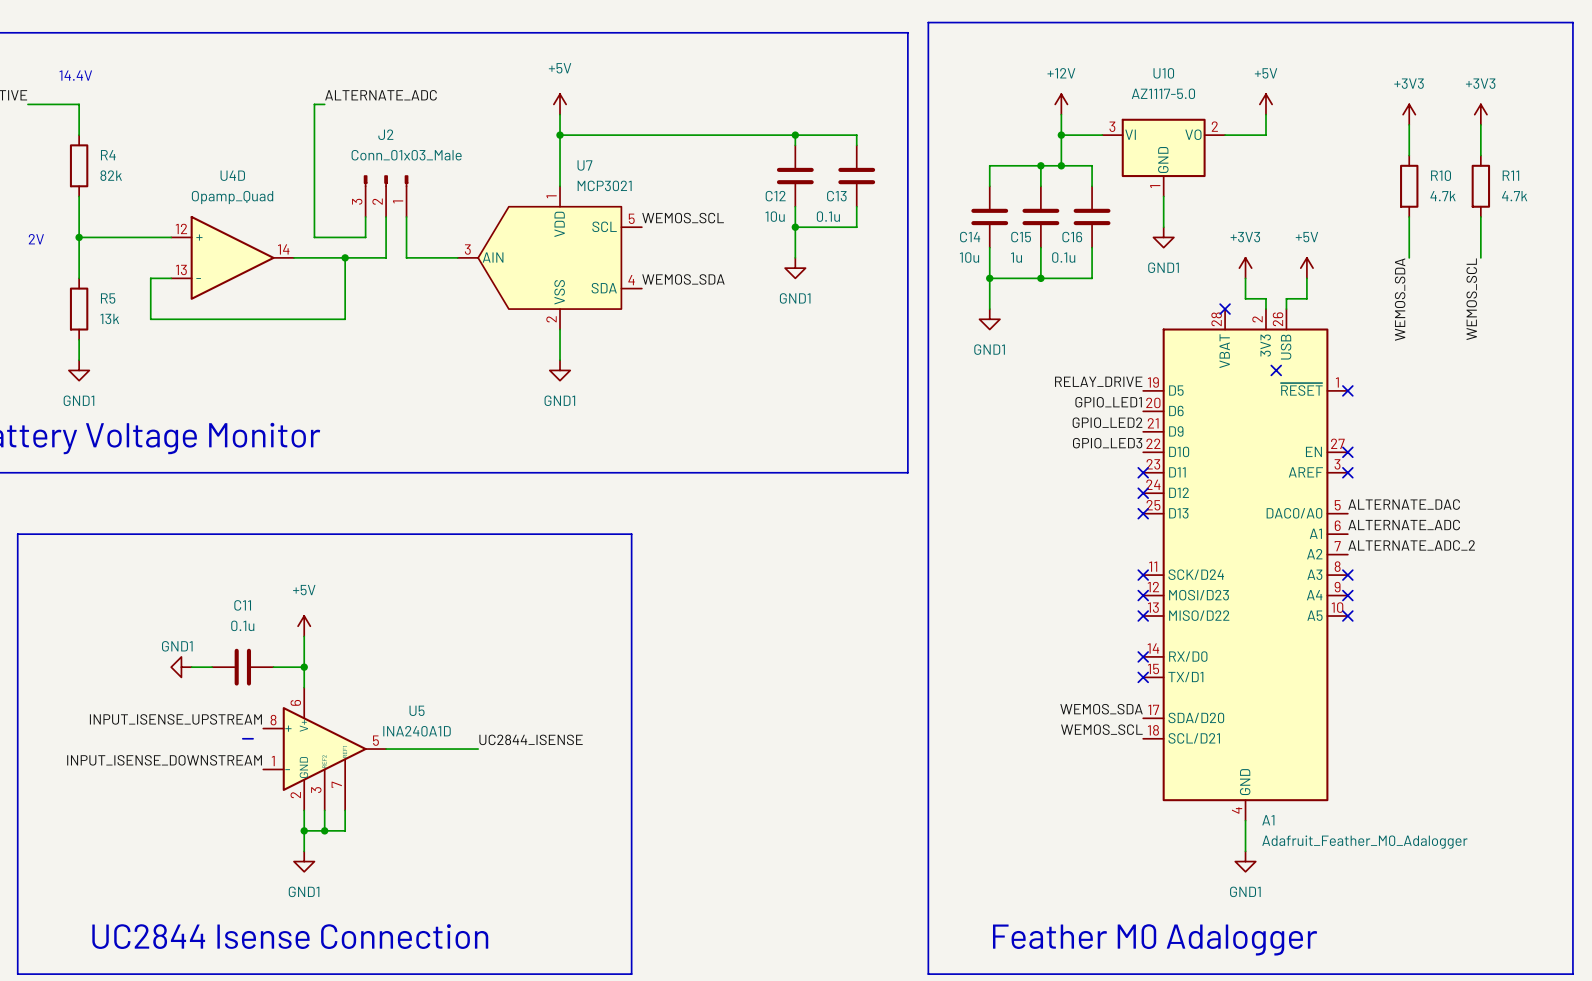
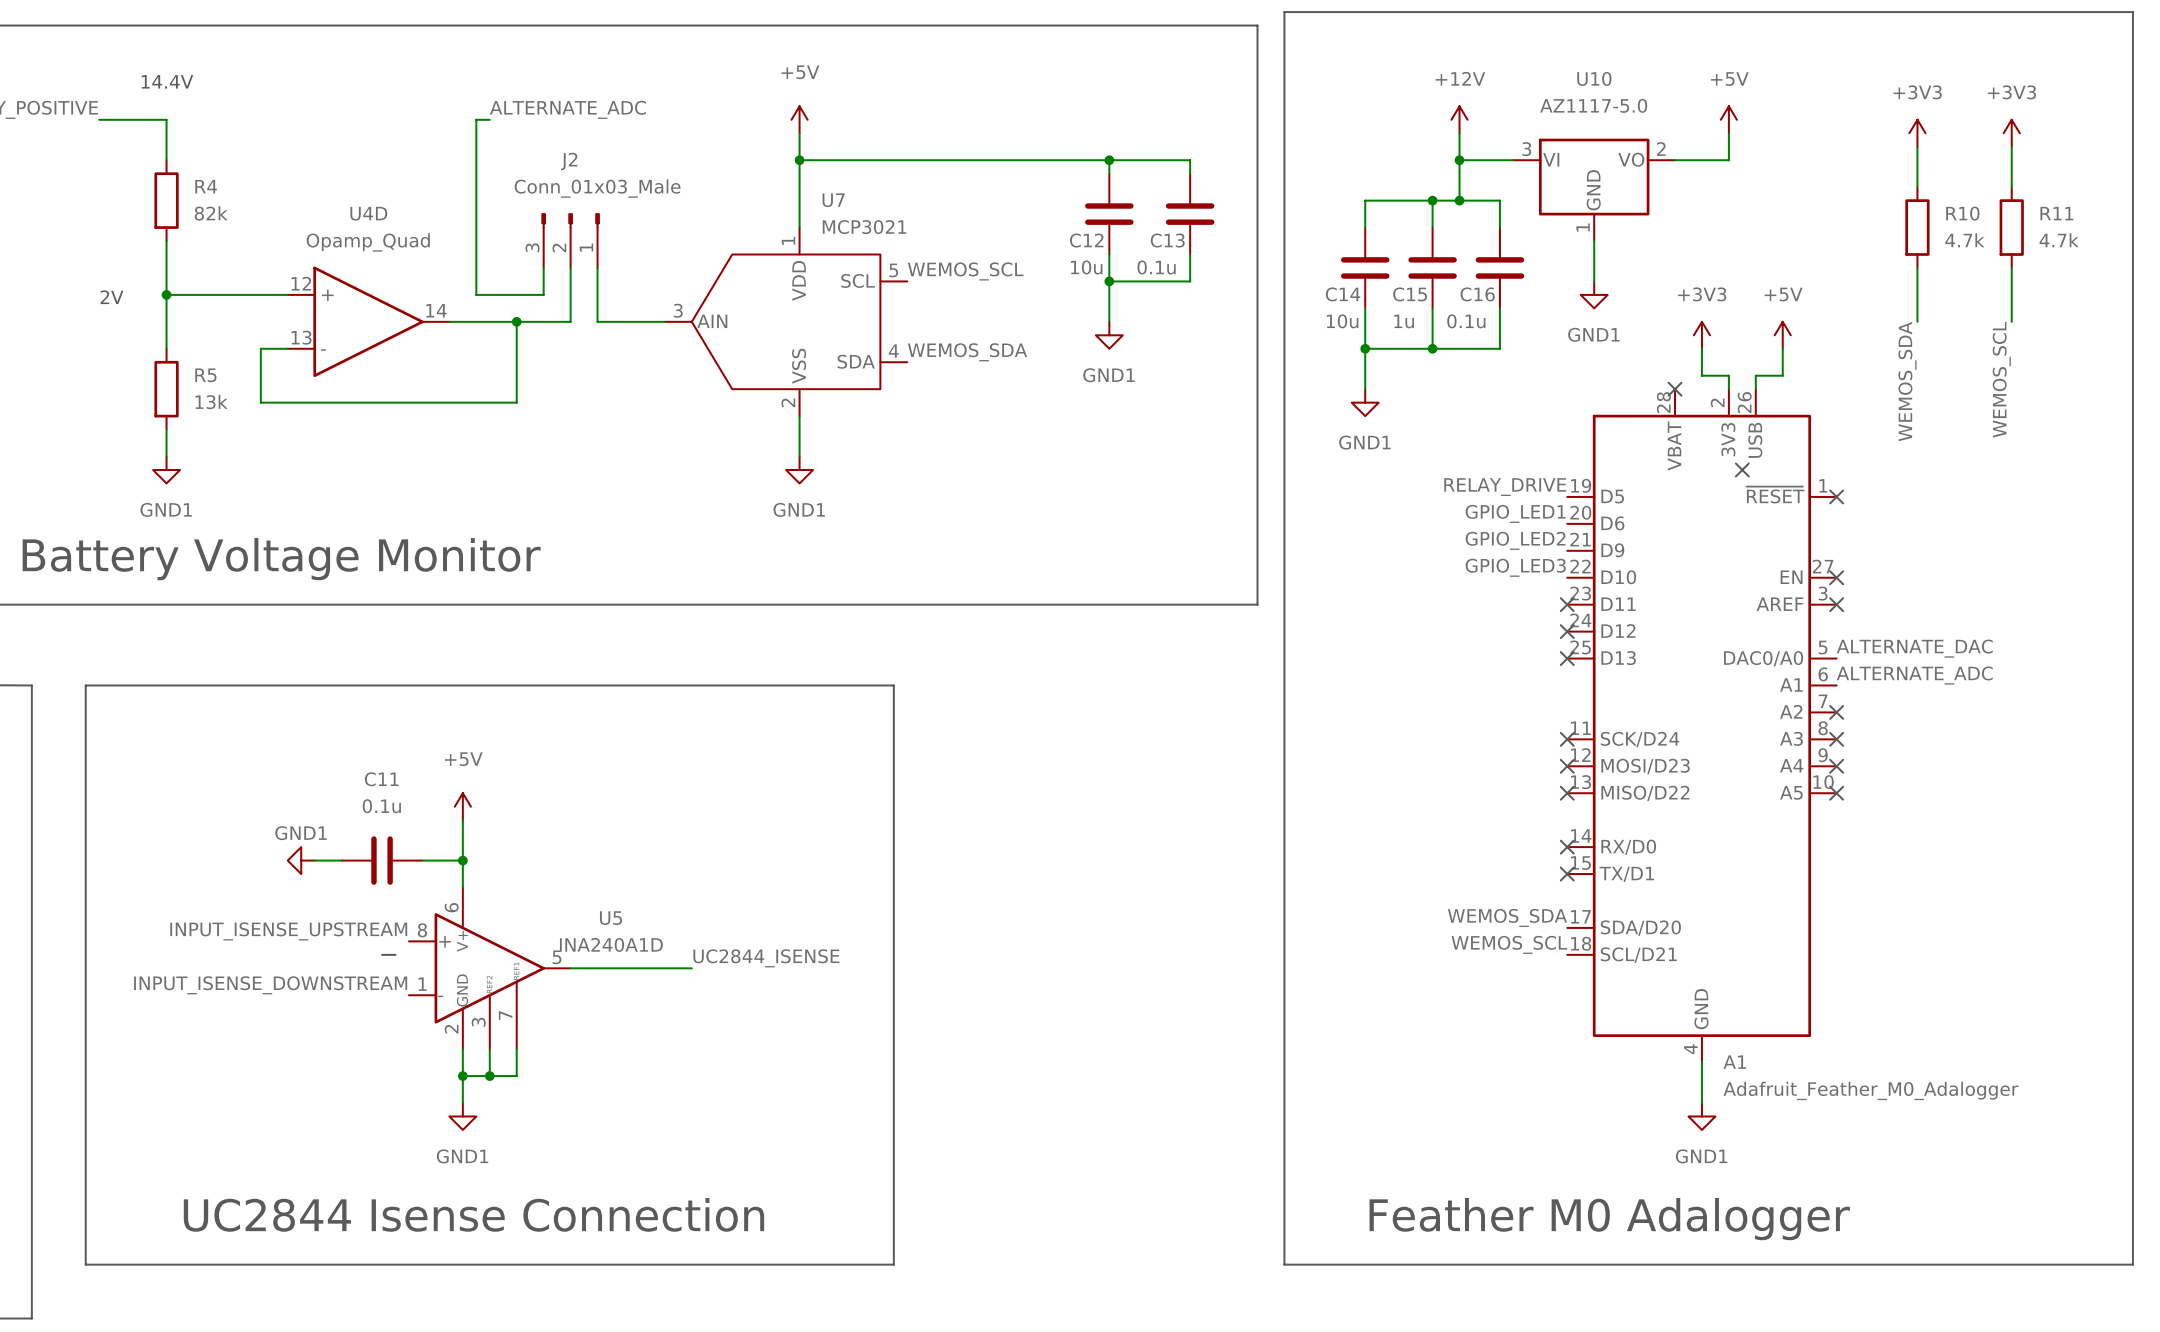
label: ALTERNATE_ADC_2 (1411, 545) -> none
no-connect mark: none -> (1836, 712)

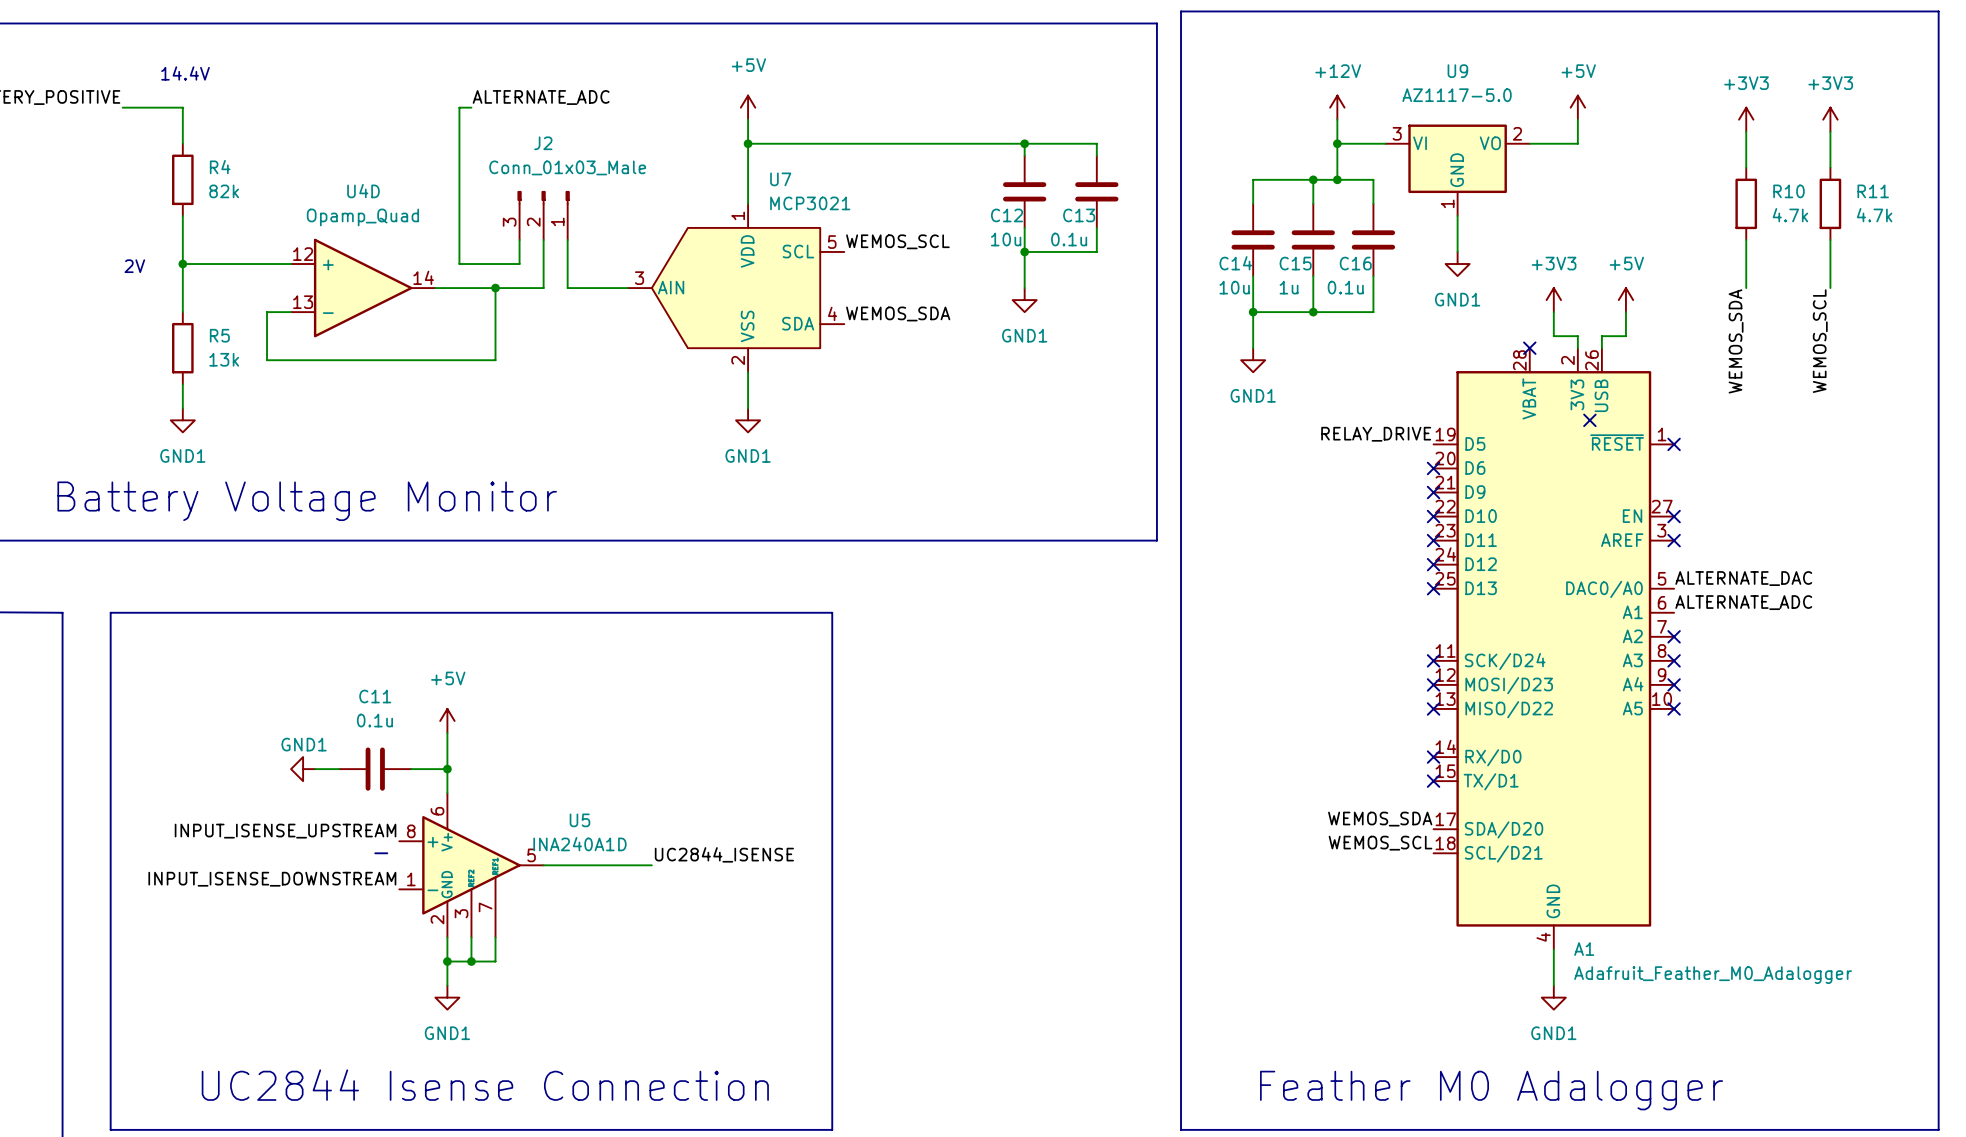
U10 name: U10 (1594, 78) -> U9 (1457, 71)
label: GPIO_LED1 (1515, 513) -> none
no-connect mark: none -> (1433, 468)
label: GPIO_LED2 (1515, 540) -> none
no-connect mark: none -> (1433, 492)
label: GPIO_LED3 (1515, 567) -> none
no-connect mark: none -> (1433, 516)

